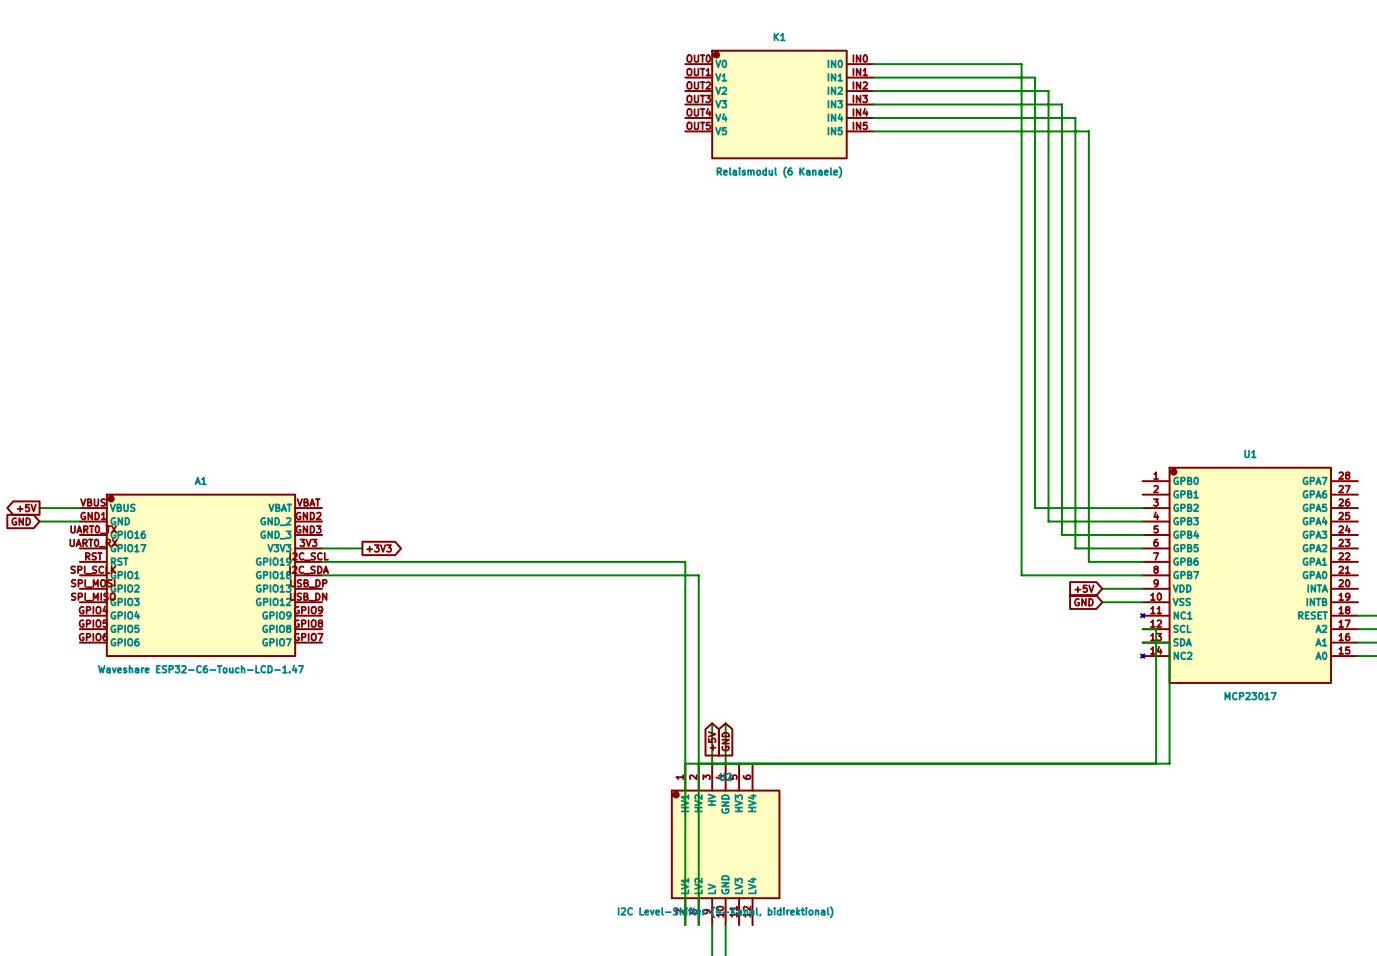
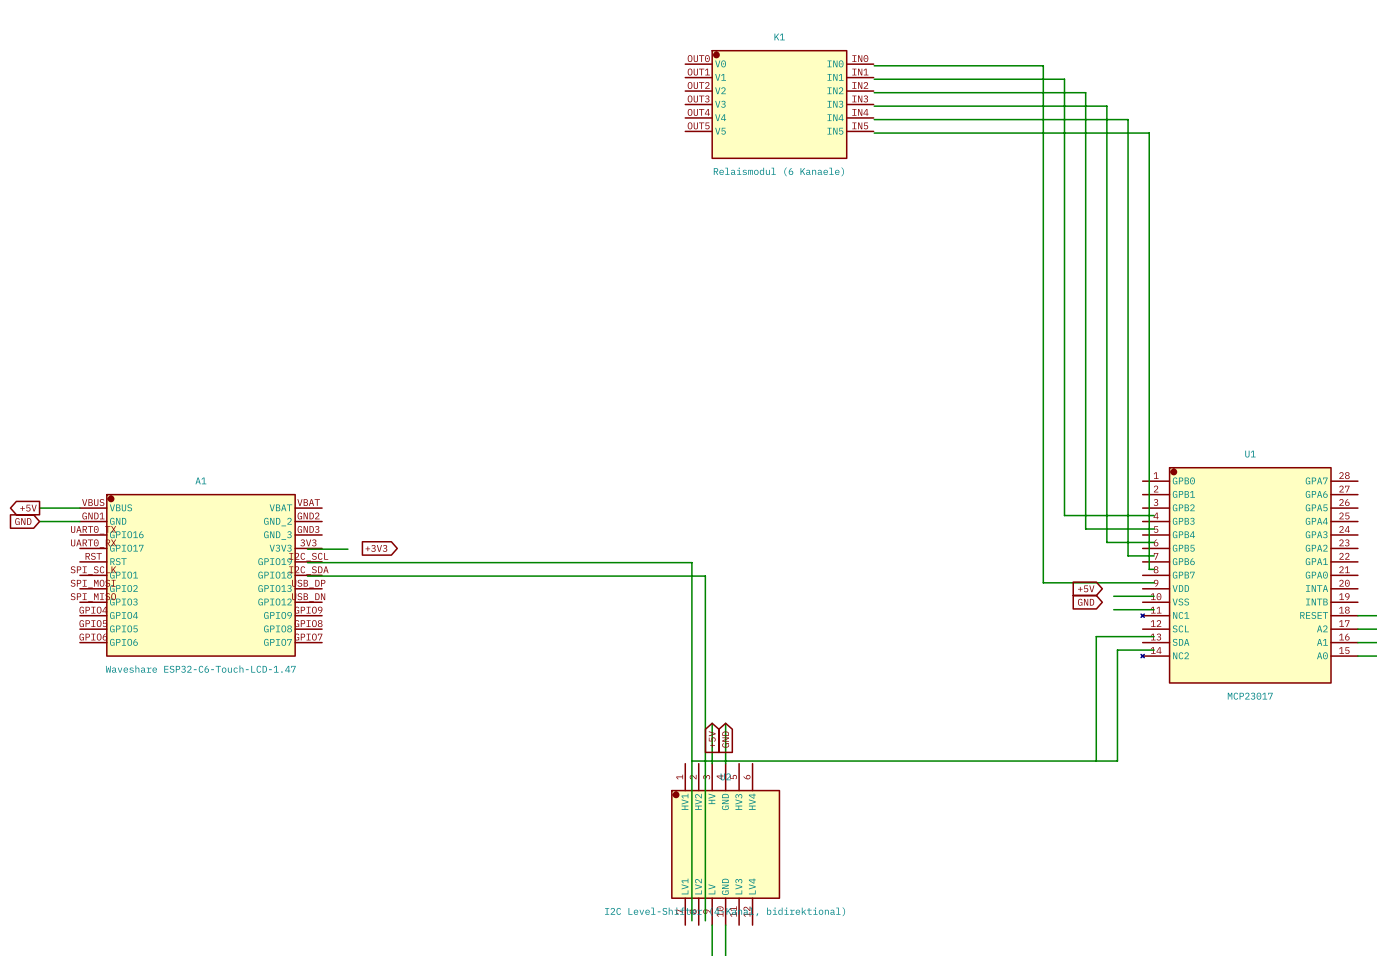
wire: (873, 64) (1021, 64) (1021, 575) (1142, 575) -> none
wire: none -> (874, 65) (1043, 65) (1043, 582) (1154, 582)
wire: (873, 77) (1035, 77) (1035, 508) (1142, 508) -> none
wire: none -> (874, 79) (1064, 79) (1064, 515) (1154, 515)
wire: (873, 91) (1048, 91) (1048, 521) (1142, 521) -> none
wire: none -> (874, 92) (1085, 92) (1085, 529) (1154, 529)
wire: (873, 104) (1061, 104) (1061, 534) (1142, 534) -> none
wire: none -> (874, 106) (1106, 106) (1106, 542) (1154, 542)
wire: (873, 117) (1075, 117) (1075, 548) (1142, 548) -> none
wire: none -> (874, 119) (1128, 119) (1128, 555) (1154, 555)
wire: (873, 131) (1088, 131) (1088, 561) (1142, 561) -> none
wire: none -> (874, 133) (1149, 133) (1149, 569) (1154, 569)
wire: (322, 548) (362, 548) -> (307, 549) (347, 549)
wire: (322, 561) (685, 561) (685, 925) -> none
wire: none -> (307, 562) (691, 562) (691, 920)
wire: (322, 575) (698, 575) (698, 925) -> none
wire: none -> (307, 576) (705, 576) (705, 920)
wire: (1102, 588) (1142, 588) -> (1113, 596) (1154, 596)
wire: (1102, 602) (1142, 602) -> (1113, 609) (1154, 609)
wire: (1142, 629) (1156, 629) (1156, 763) -> none
wire: none -> (1154, 636) (1096, 636) (1096, 761)
wire: (1142, 642) (1169, 642) (1169, 763) (685, 763) -> none
wire: none -> (1154, 650) (1117, 650) (1117, 761) (691, 761)

